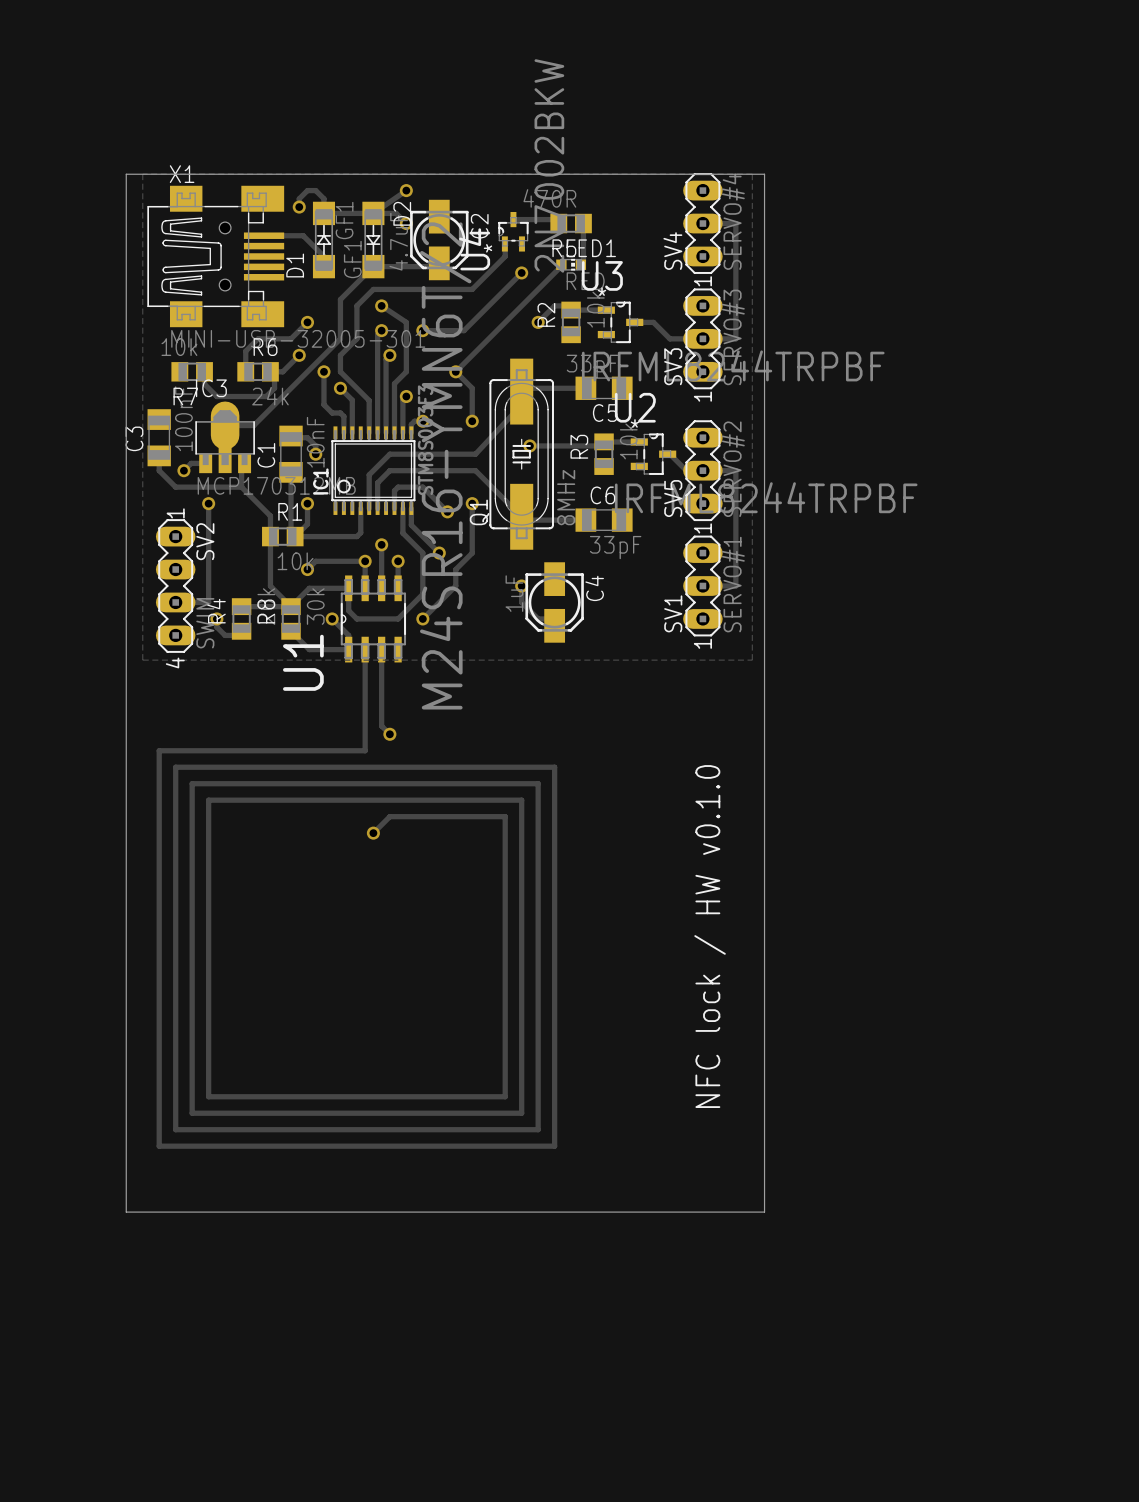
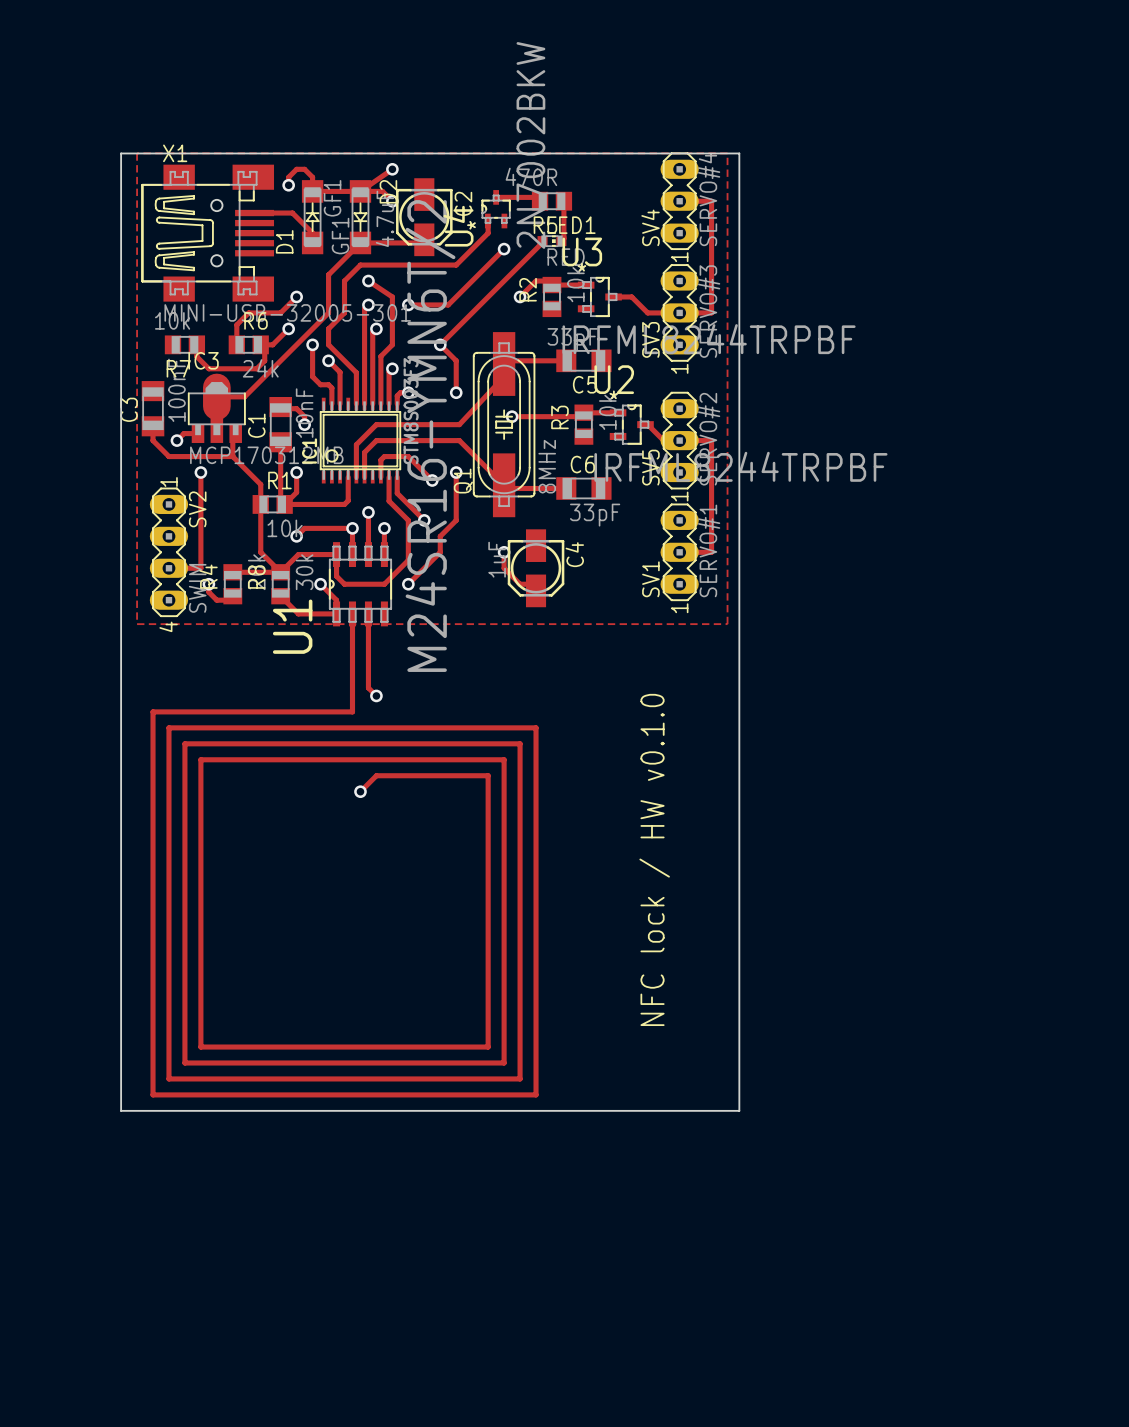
text position: NFC lock / HW v0.1.0 (710, 936) -> NFC lock / HW v0.1.0 (654, 859)
board edge: (126, 1162) (126, 1212) (764, 1212) (764, 1162) -> (121, 1110) (739, 1110)

